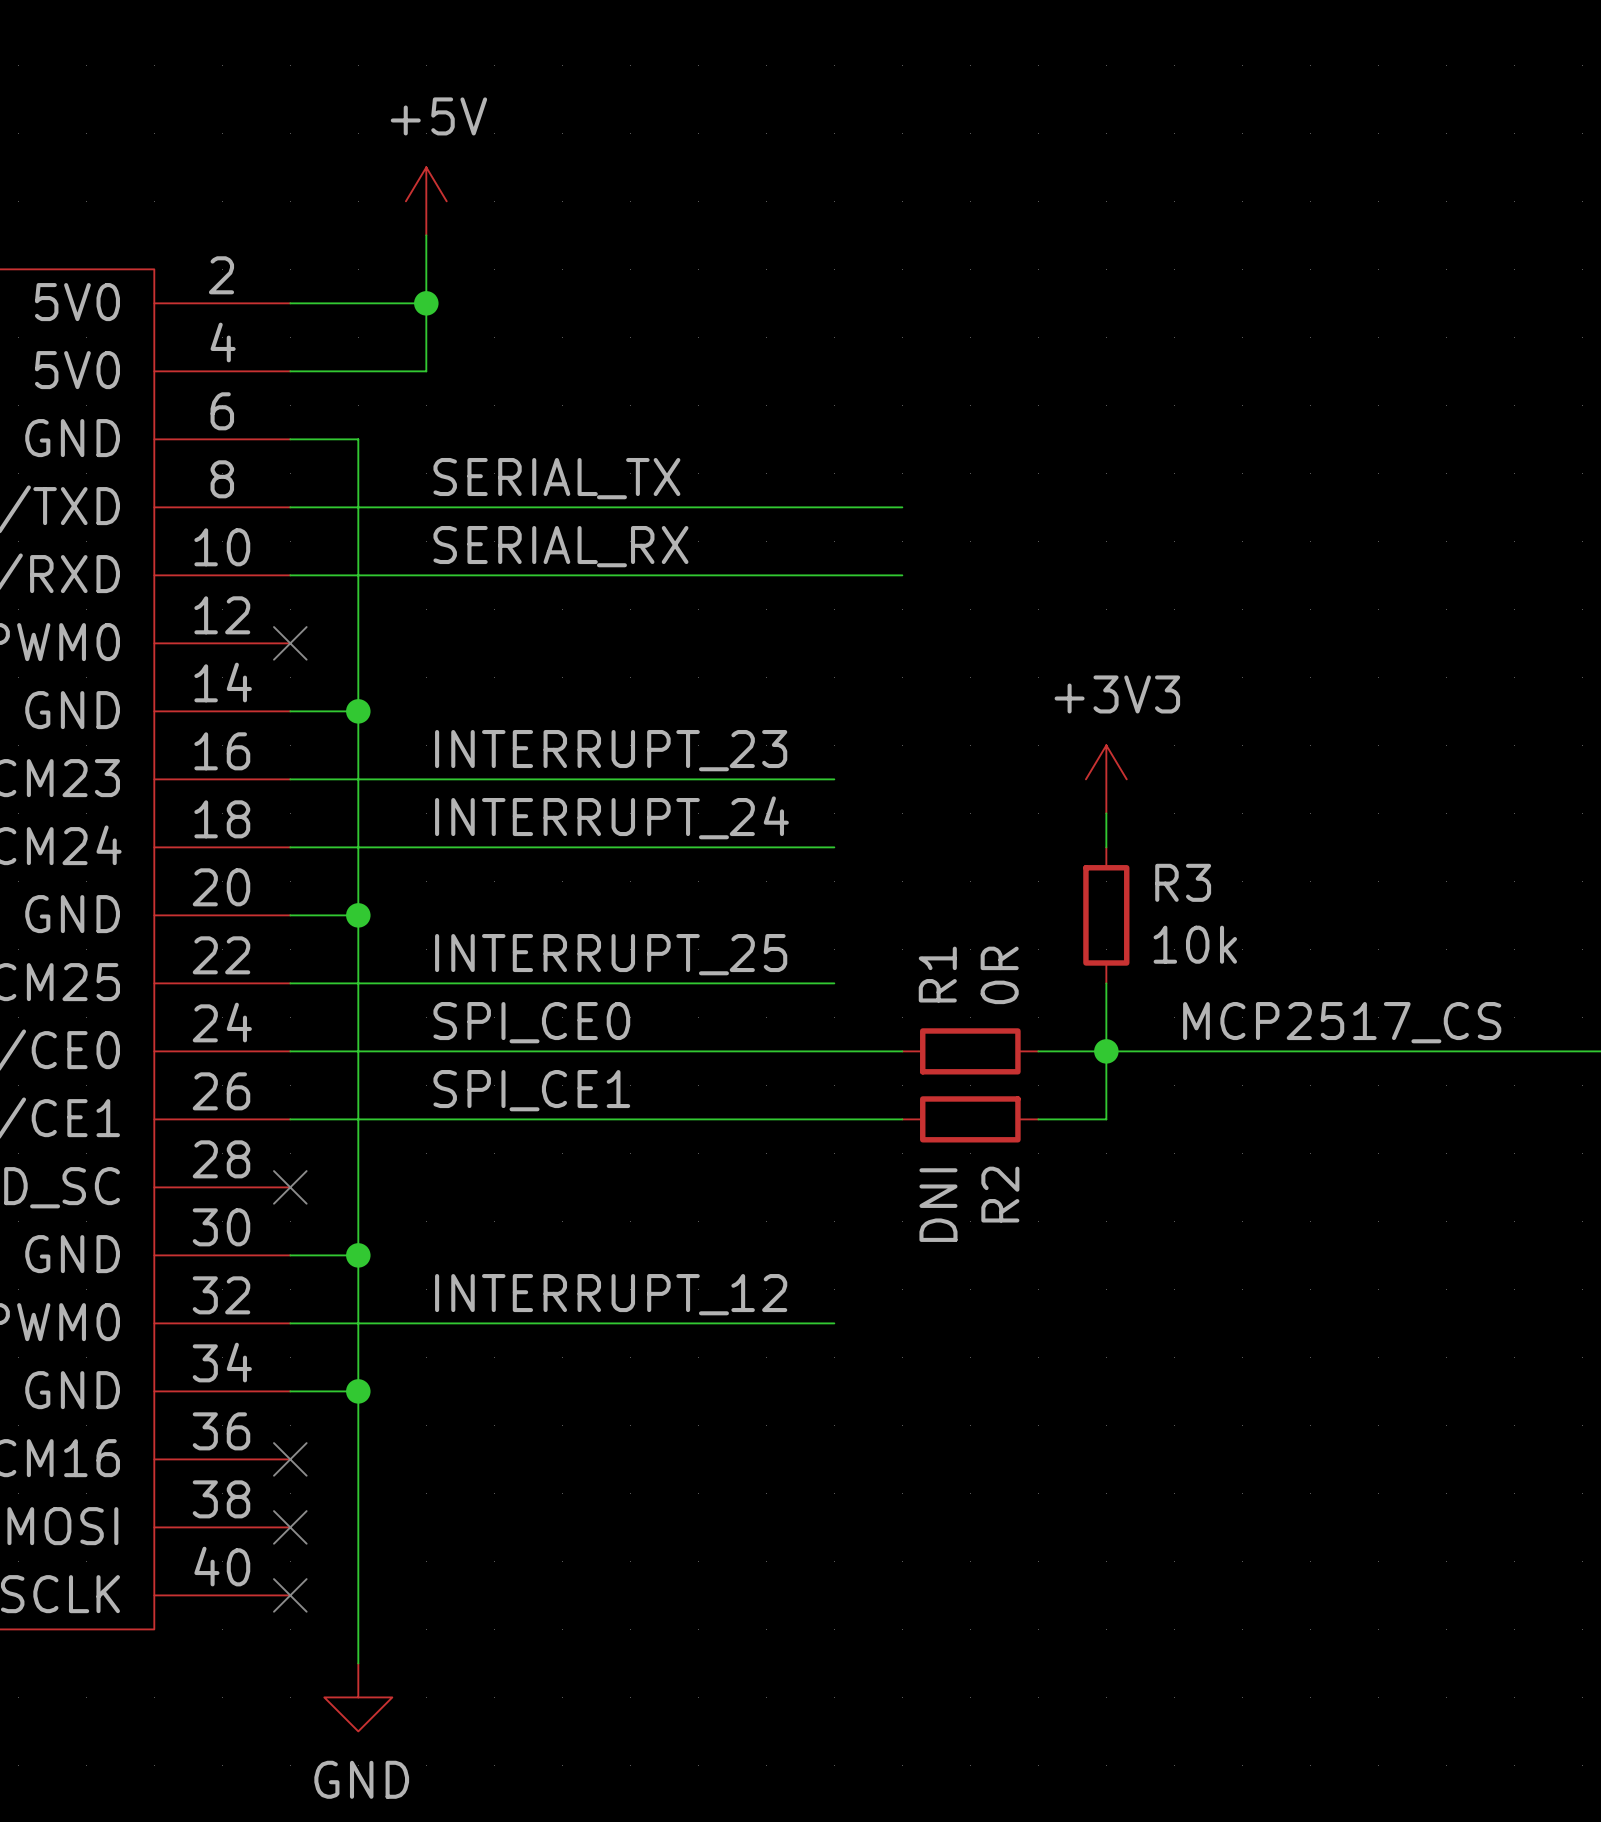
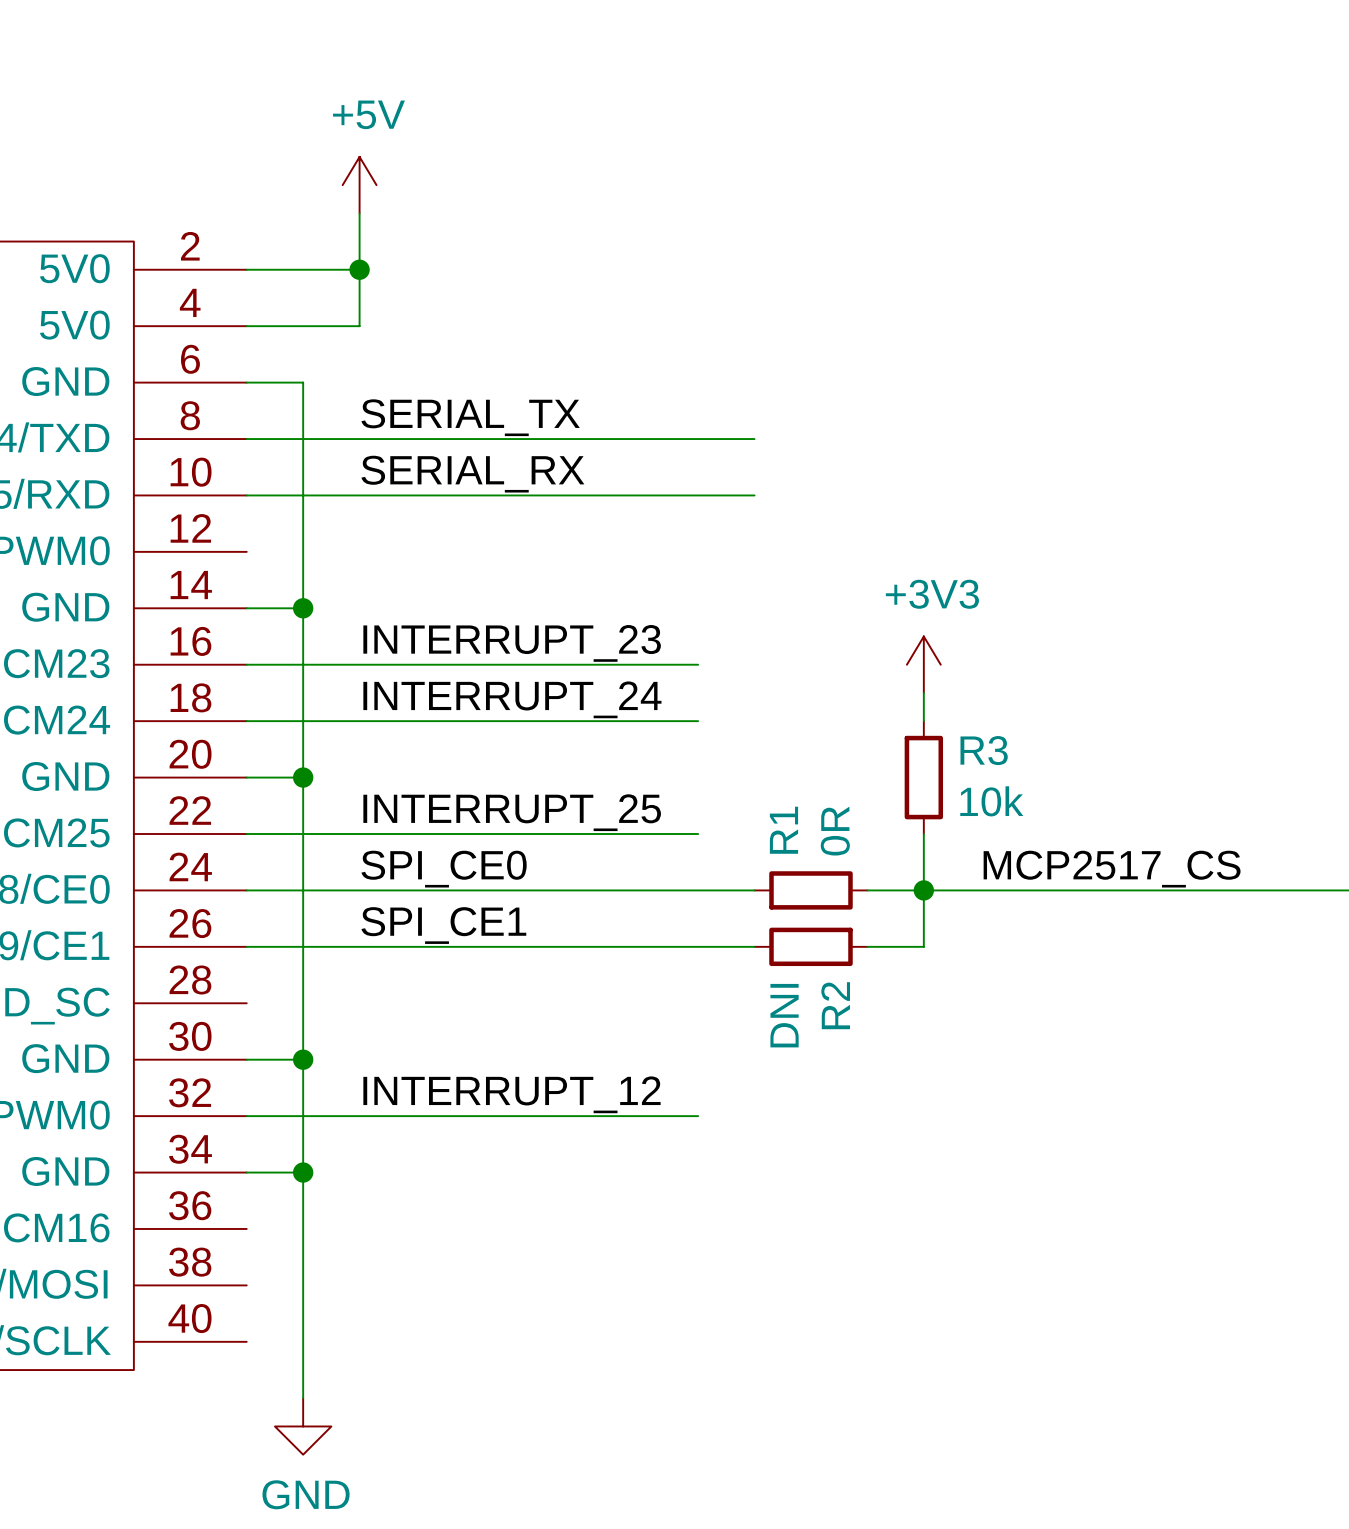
no-connect mark: (290, 643) -> none
no-connect mark: (290, 1187) -> none
no-connect mark: (290, 1459) -> none
no-connect mark: (290, 1527) -> none
no-connect mark: (290, 1595) -> none

